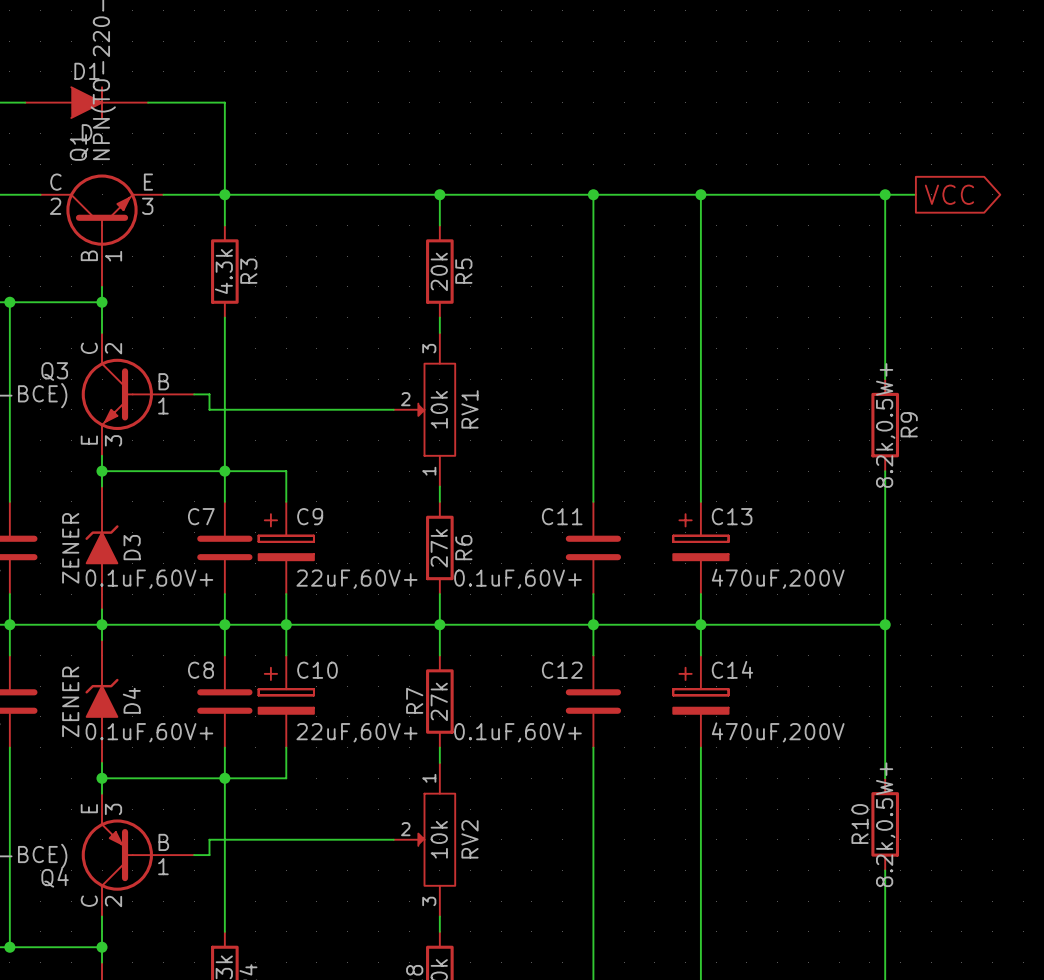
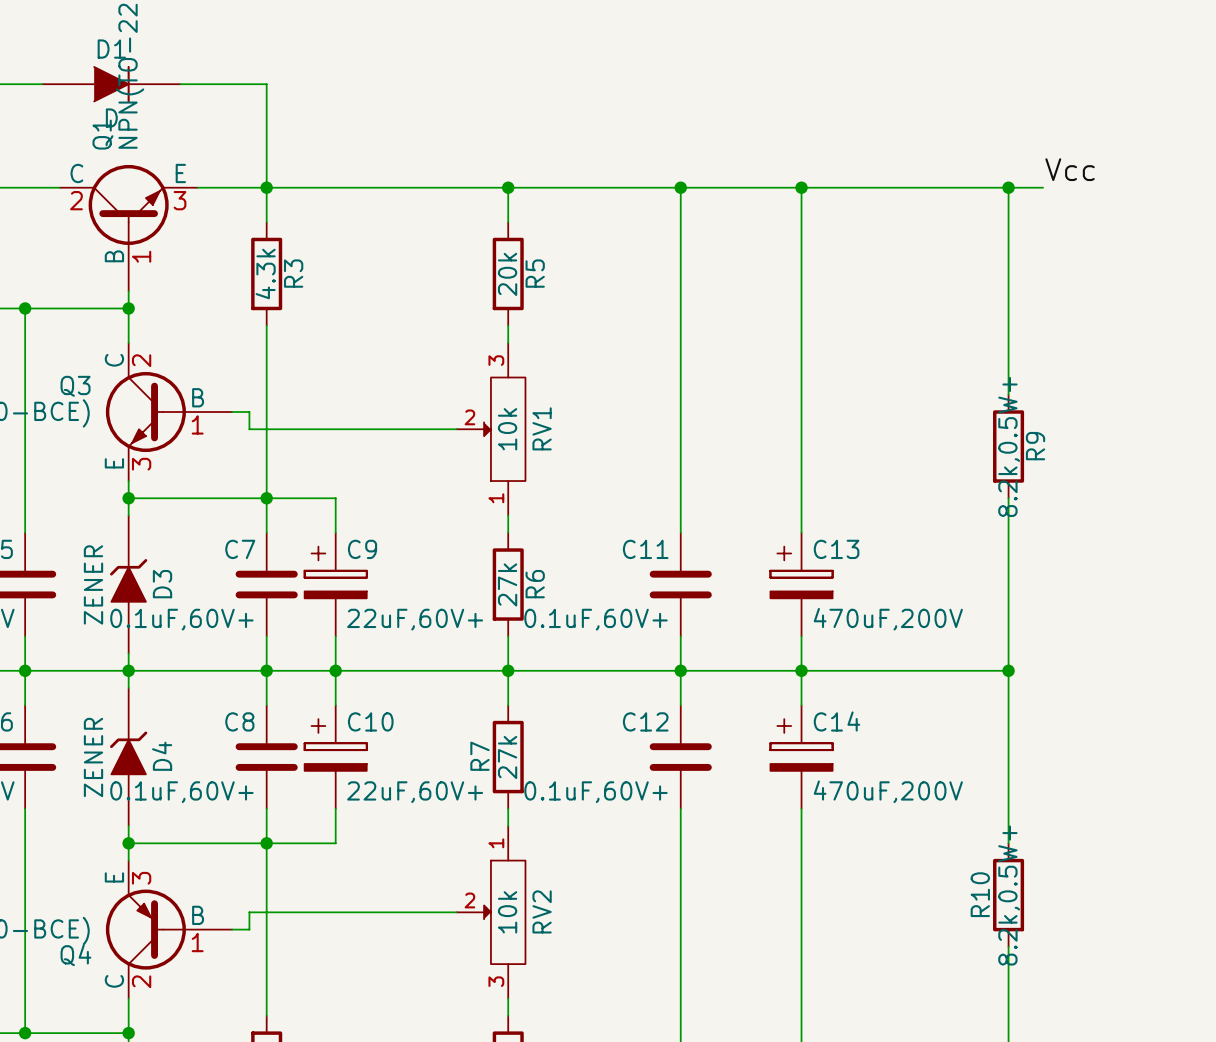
label: none -> Vcc (1070, 169)
global label: VCC (949, 194) -> none

